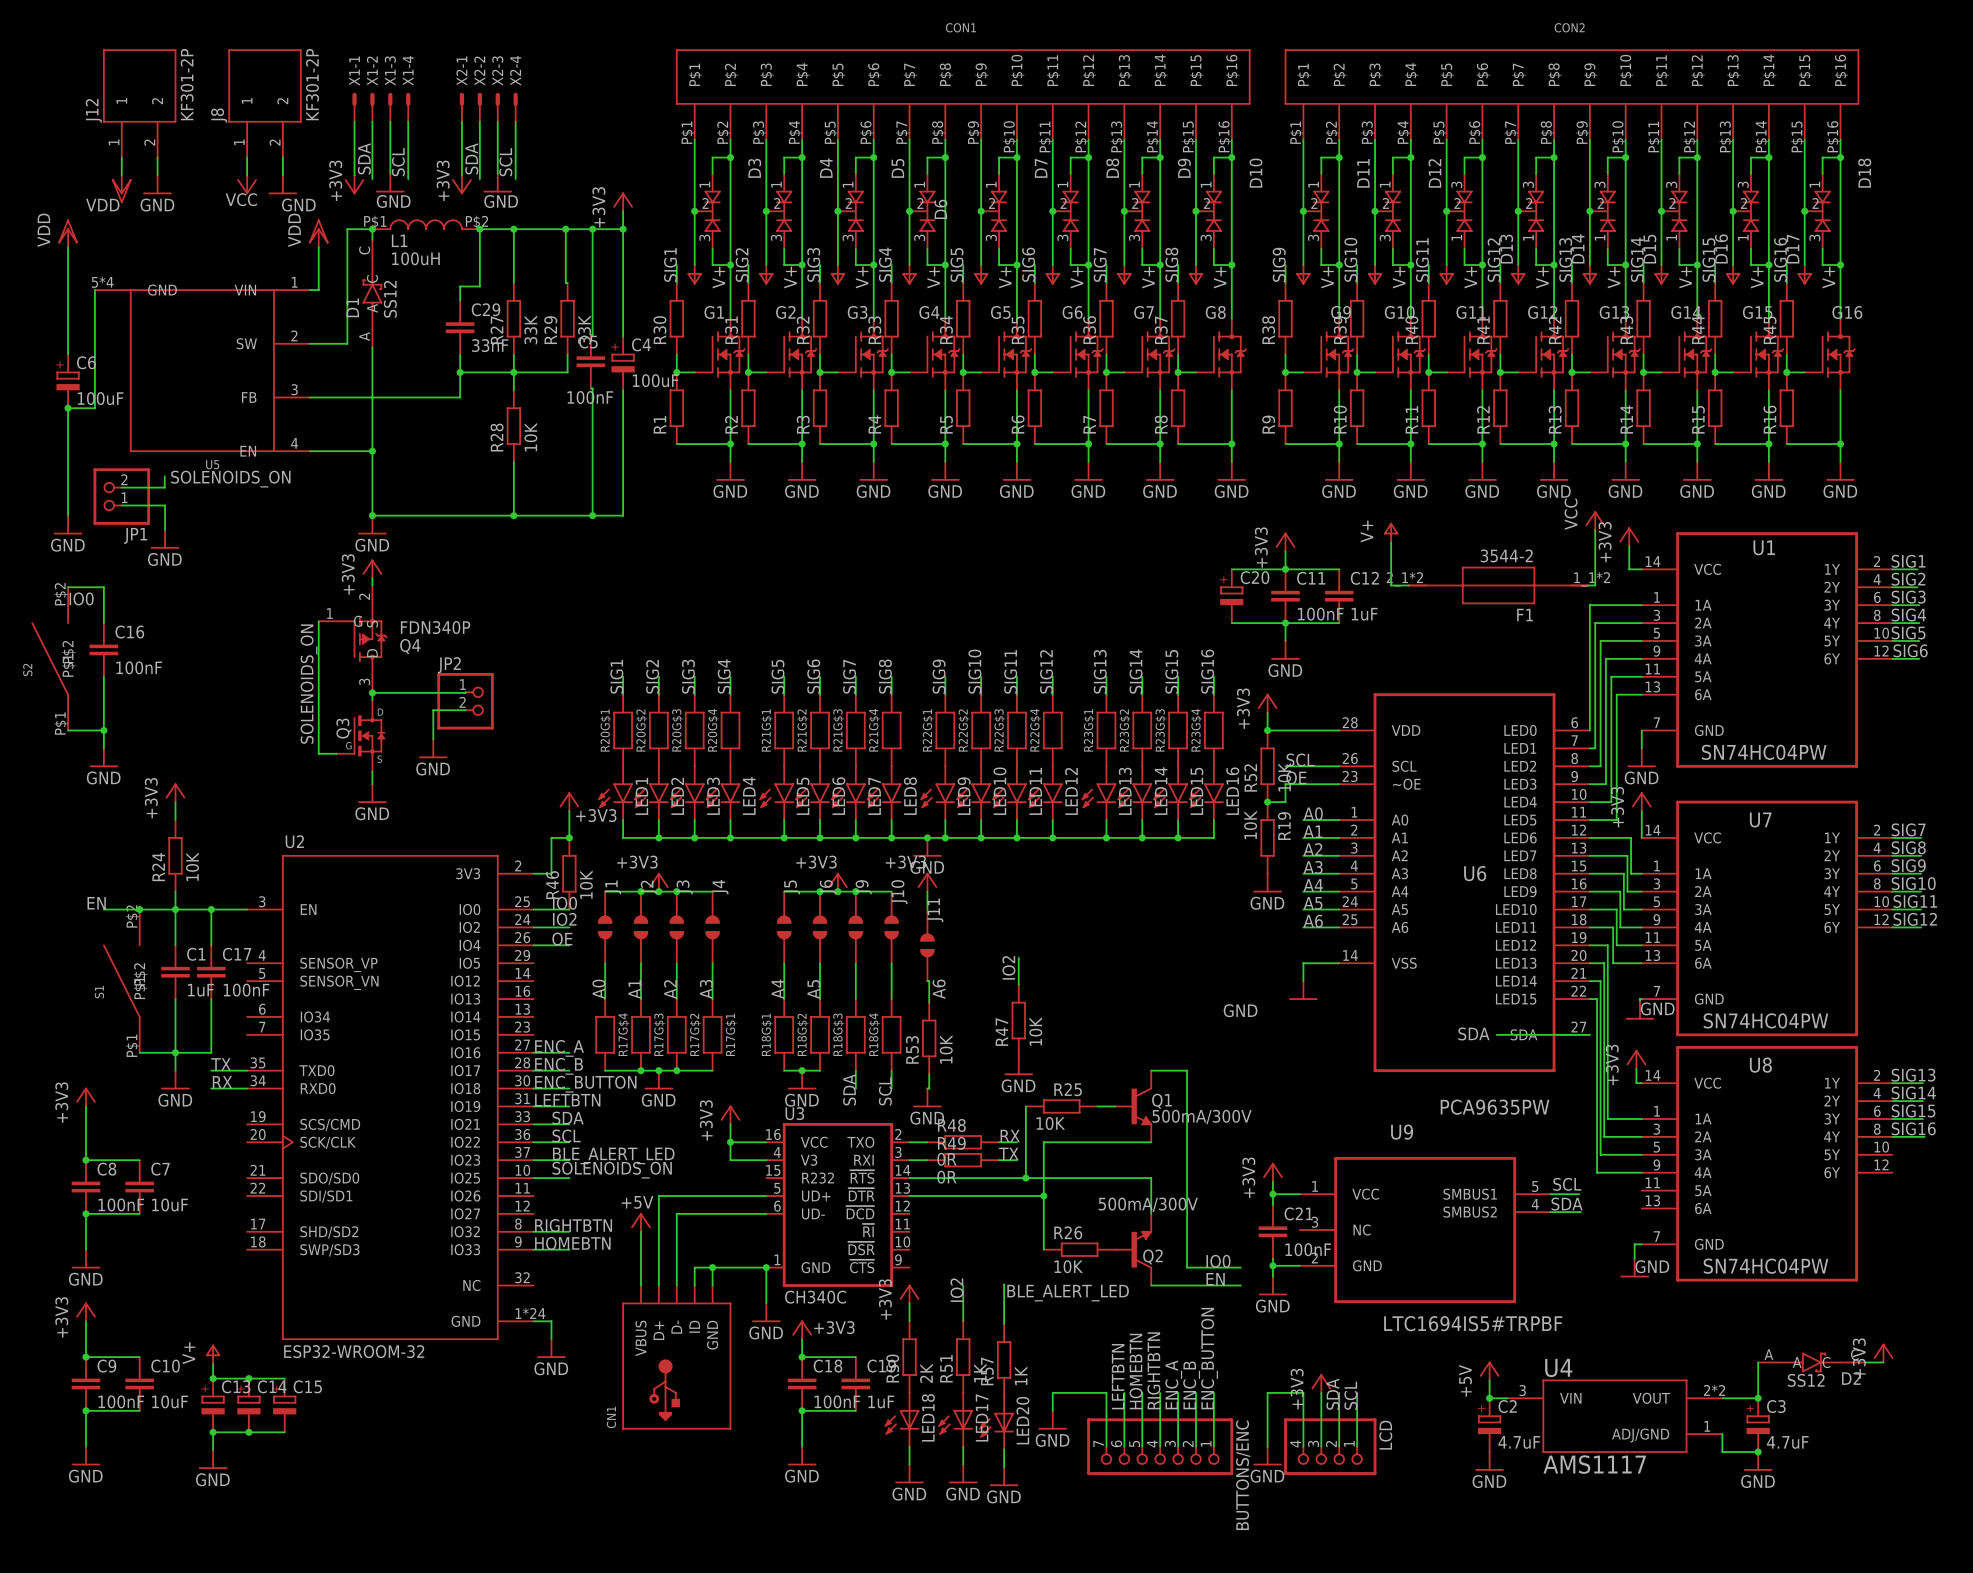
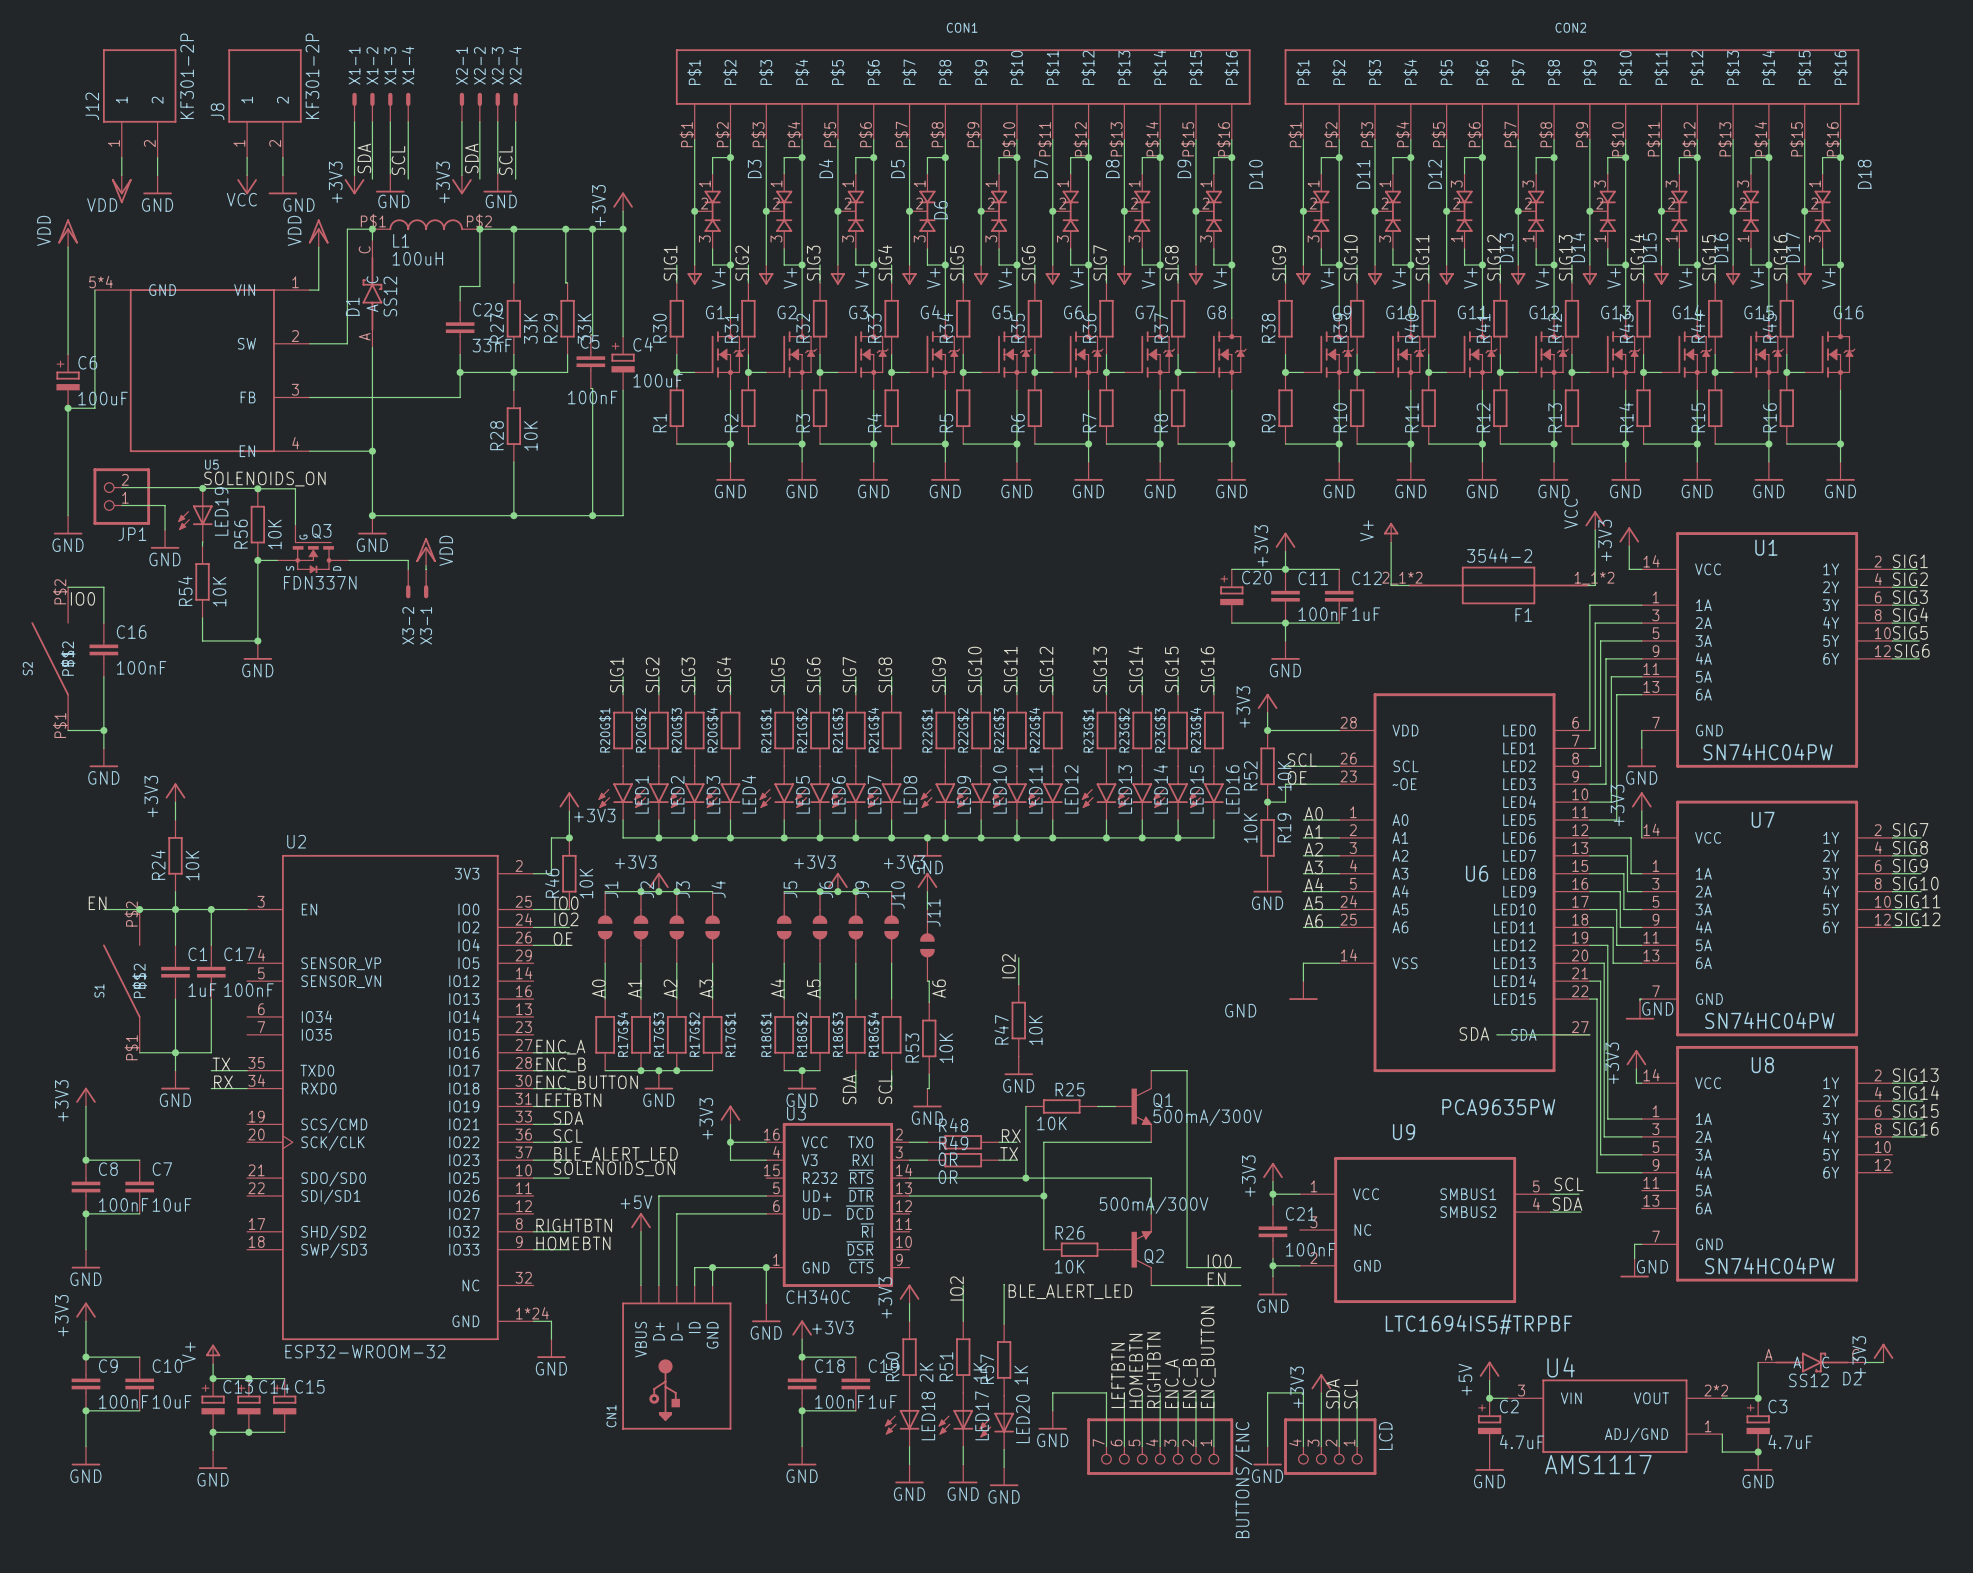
wire: (164, 476) (164, 487) -> (202, 488) (164, 487)
label position: SOLENOIDS_ON (230, 479) -> SOLENOIDS_ON (264, 479)
wire: none -> (202, 488) (295, 488) (295, 524)
junction: none -> (202, 488)
junction: none -> (257, 488)
LED19: none -> (195, 515)
R56: none -> 10K (257, 524)
wire: none -> (202, 542) (202, 546)
power symbol: none -> VDD (426, 551)
junction: none -> (257, 560)
wire: none -> (277, 560) (257, 560) (257, 640) (202, 640) (202, 617)
wire: none -> (349, 560) (408, 560) (408, 569)
wire: none -> (426, 565) (426, 569)
power symbol: +3V3 (372, 568) -> none
wire: (372, 578) (372, 585) -> none
R54: none -> 10K (202, 581)
Q3 value: none -> FDN337N (320, 582)
X3-2: none -> (408, 583)
X3-1: none -> (426, 583)
wire: (318, 621) (318, 753) (336, 753) -> none
Q4: FDN340P (353, 639) -> none
junction: none -> (257, 640)
power symbol: none -> GND (257, 650)
label: SOLENOIDS_ON (308, 684) -> none
junction: (372, 692) -> none
wire: (465, 692) (372, 692) (372, 700) -> none
Q3 symbol: [336, 700, 386, 772] -> [277, 524, 350, 574]
JP2: (465, 701) -> none
wire: (465, 710) (433, 710) (433, 739) -> none
Q3 name position: Q3 (343, 728) -> Q3 (321, 531)
power symbol: GND (433, 748) -> none
wire: (372, 771) (372, 784) -> none
power symbol: GND (372, 793) -> none

